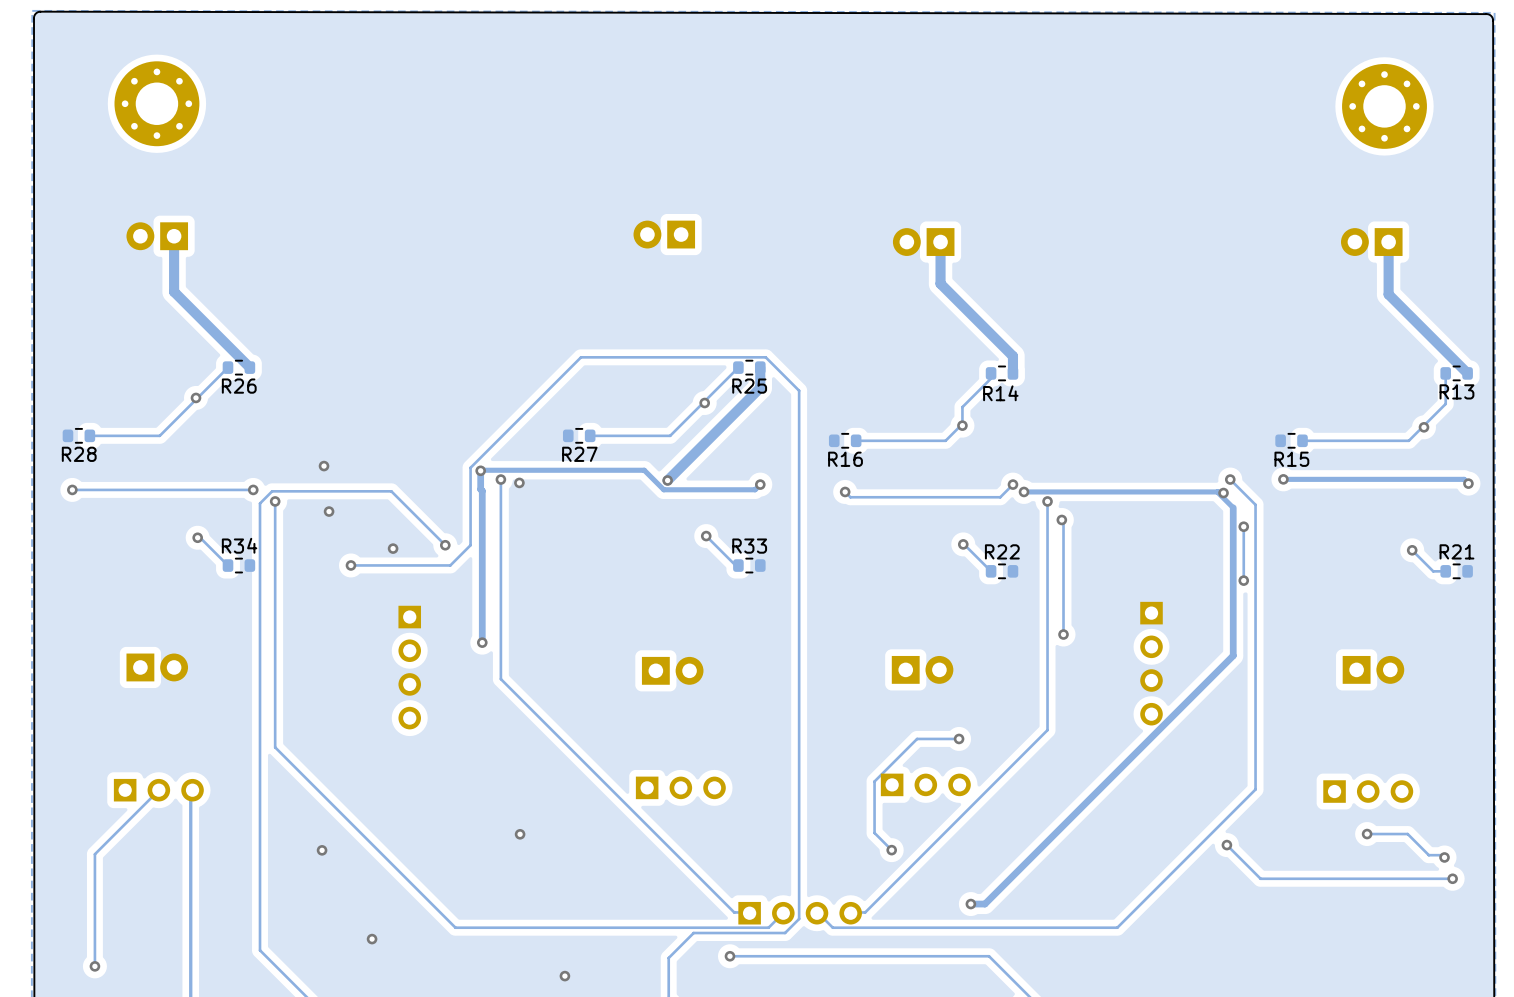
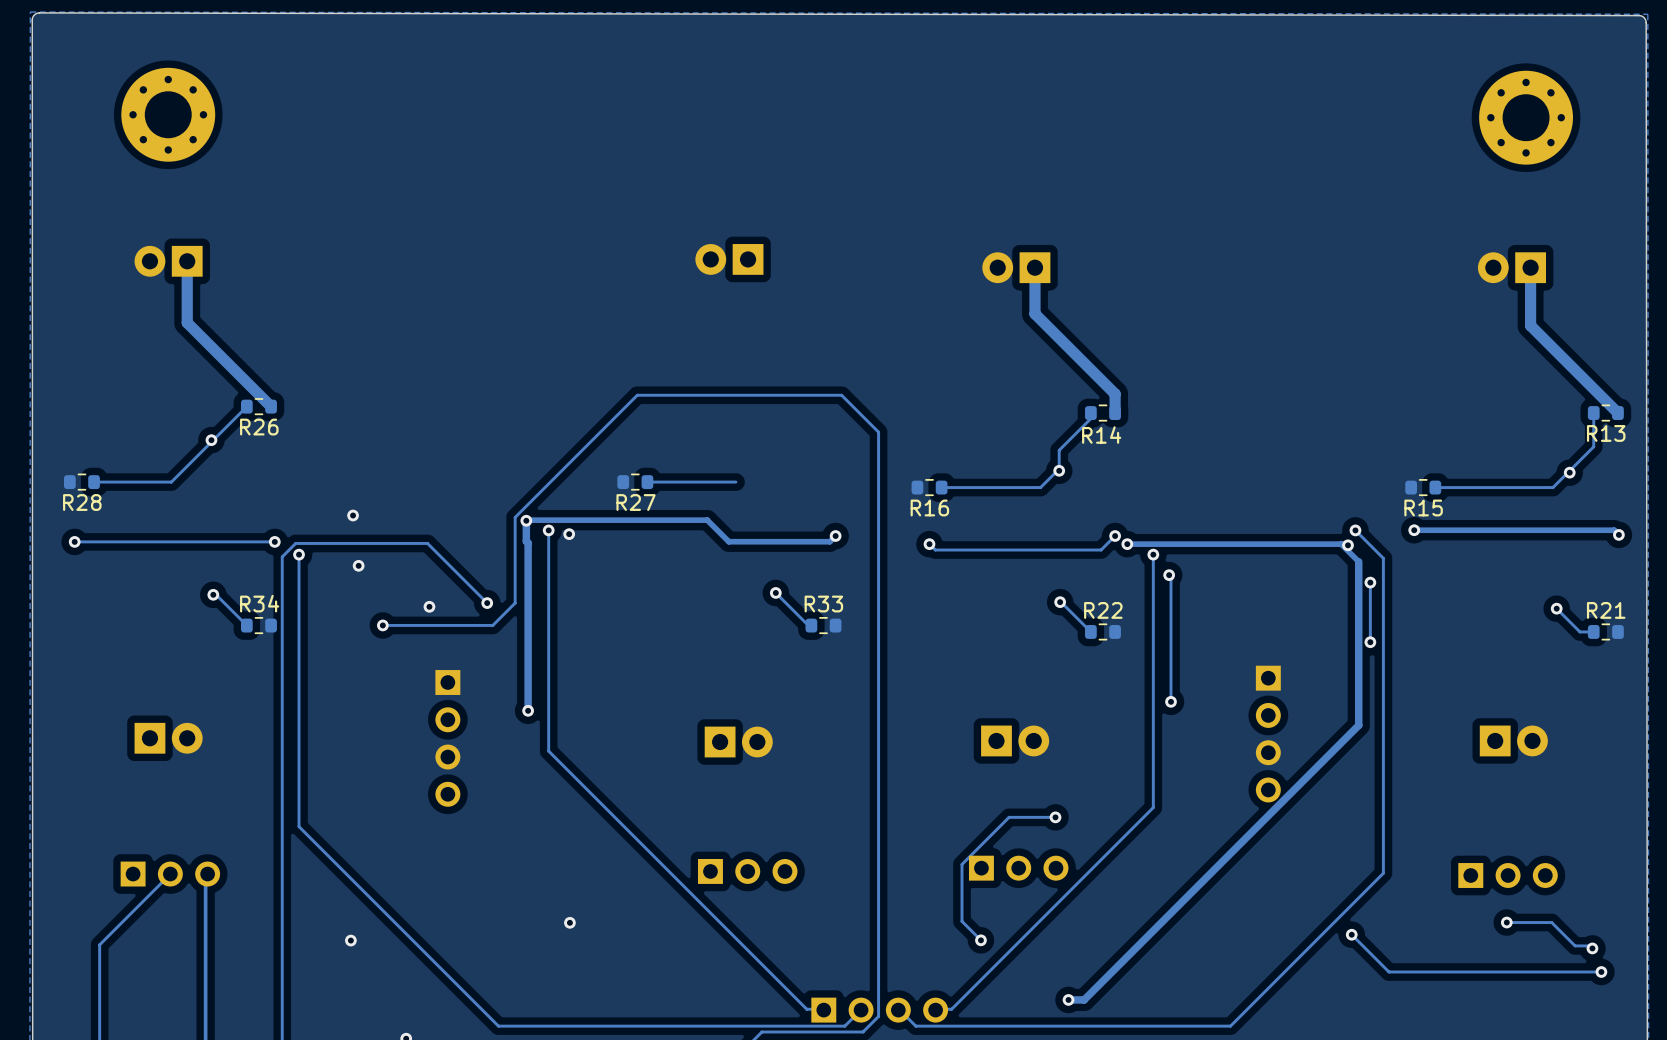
track: (738, 367) (670, 435) -> none
R25: (749, 367) -> none
track: (760, 367) (760, 387) (667, 480) -> none
via: (704, 403) -> none
via: (667, 480) -> none

